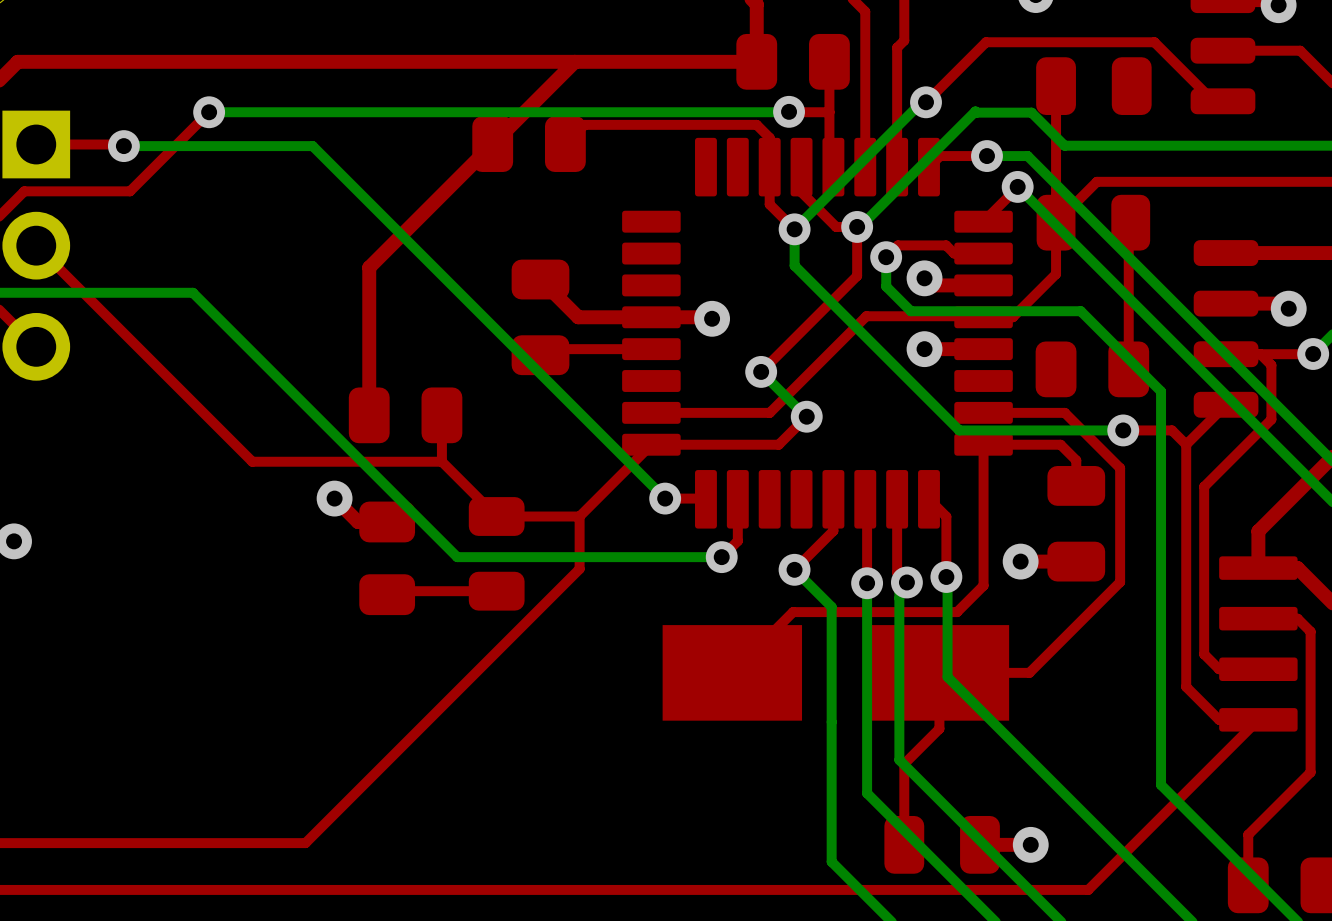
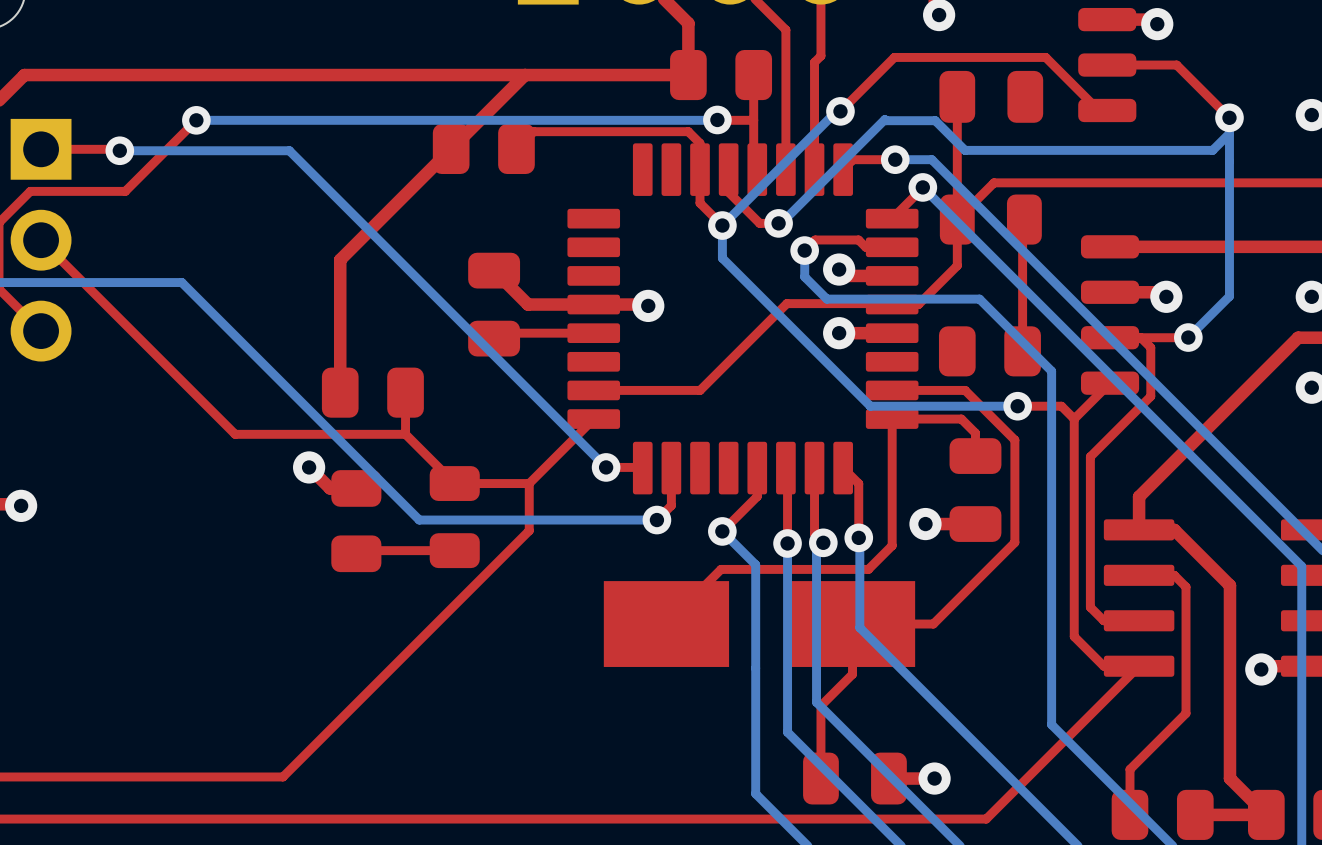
top track: (857, 226) (857, 275) (761, 371) -> none
bottom track: (761, 371) (805, 416) -> none
via: (761, 371) -> none
top track: (806, 416) (778, 444) (651, 444) -> none
via: (806, 416) -> none

